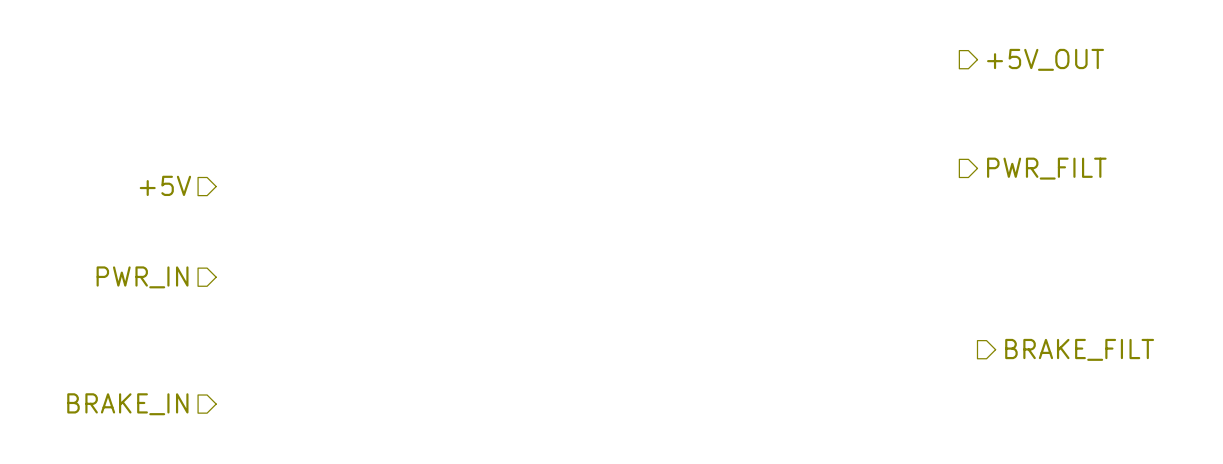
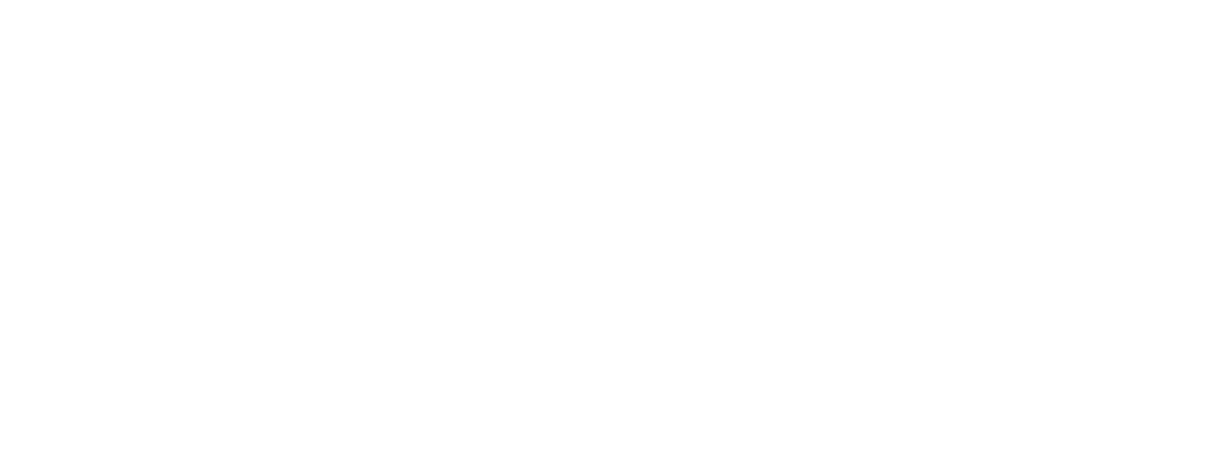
hierarchical label: +5V_OUT (1045, 59) -> none
hierarchical label: PWR_FILT (1046, 168) -> none
hierarchical label: +5V (165, 185) -> none
hierarchical label: PWR_IN (142, 277) -> none
hierarchical label: BRAKE_FILT (1079, 349) -> none
hierarchical label: BRAKE_IN (127, 404) -> none

